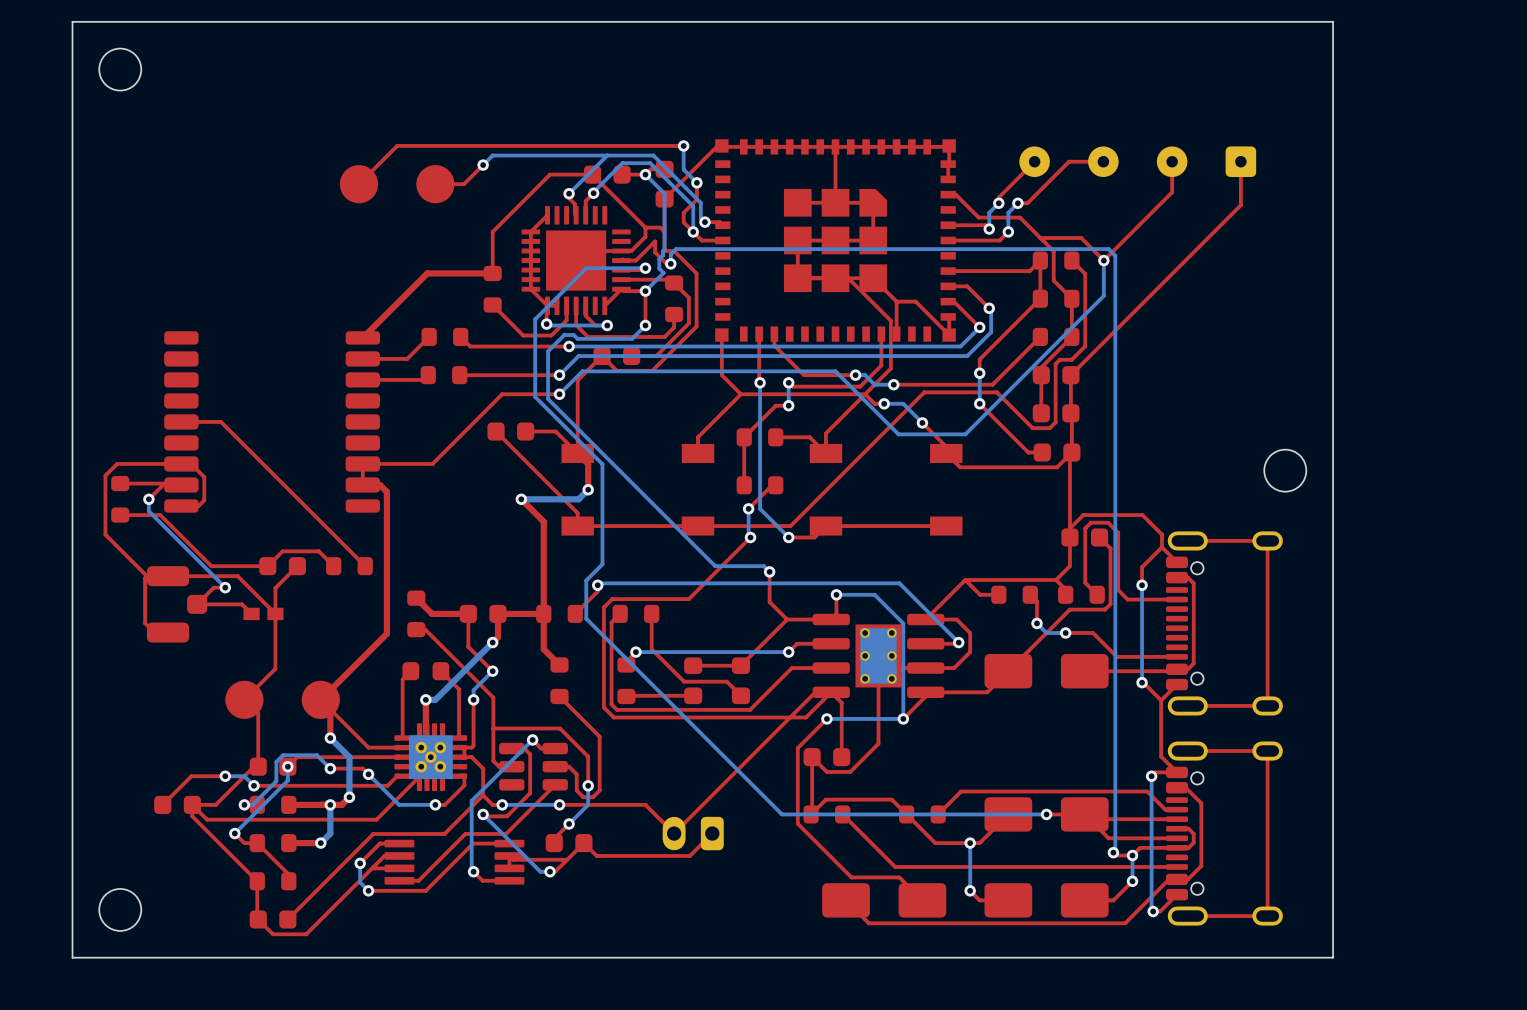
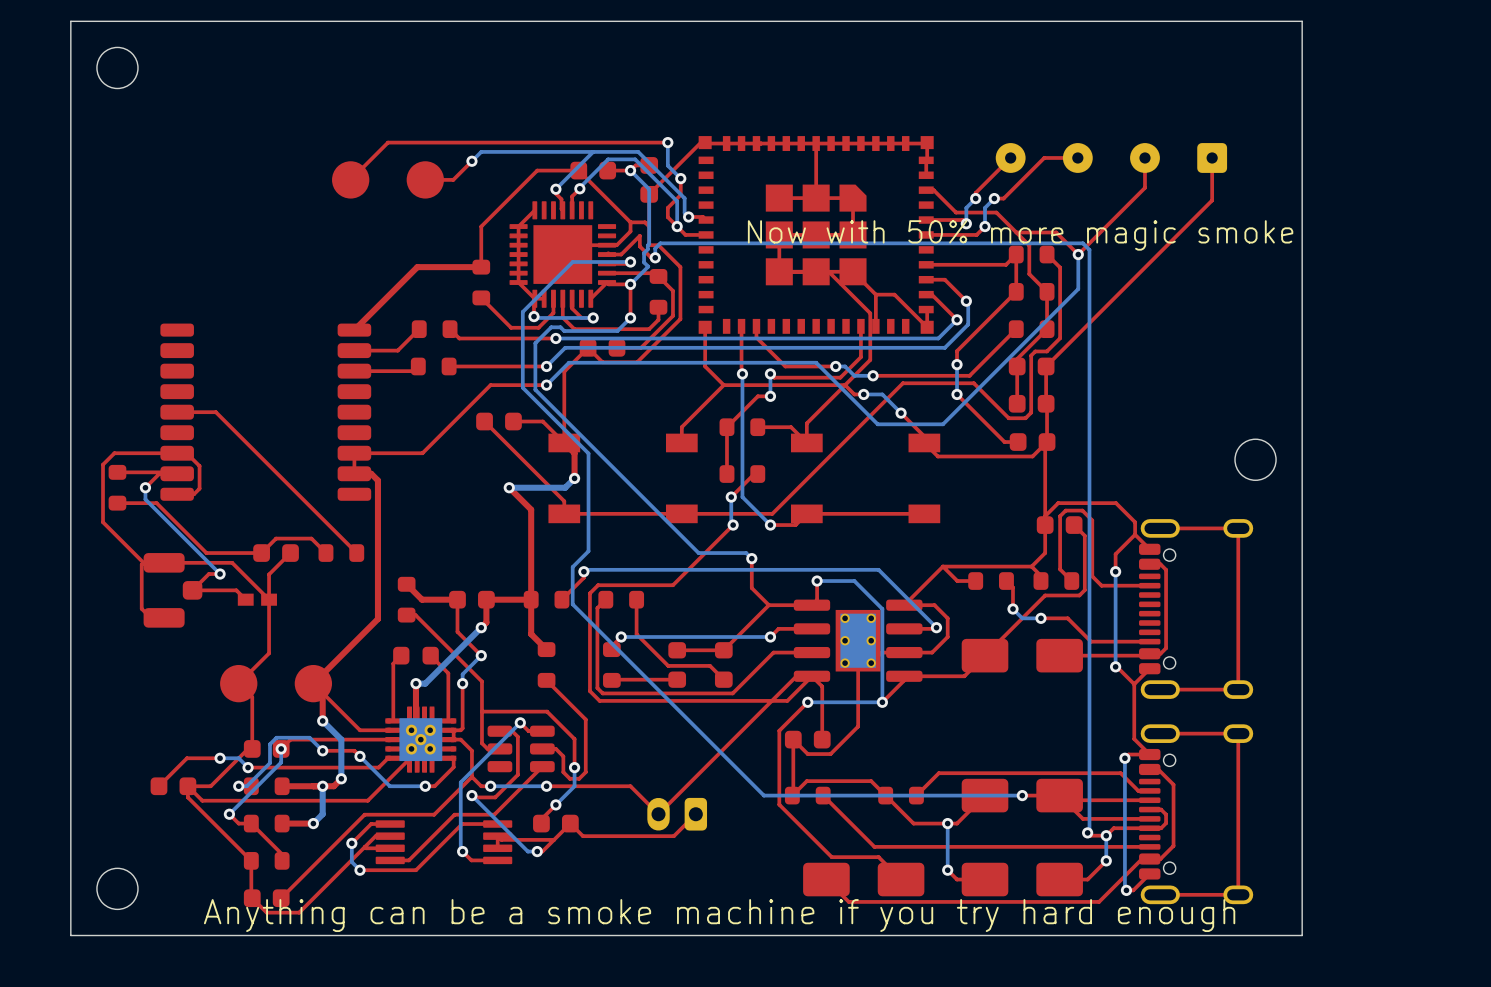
text: none -> Now with 50% more magic smoke (1020, 235)
text: none -> Anything can be a smoke machine if you try hard enough (719, 915)

